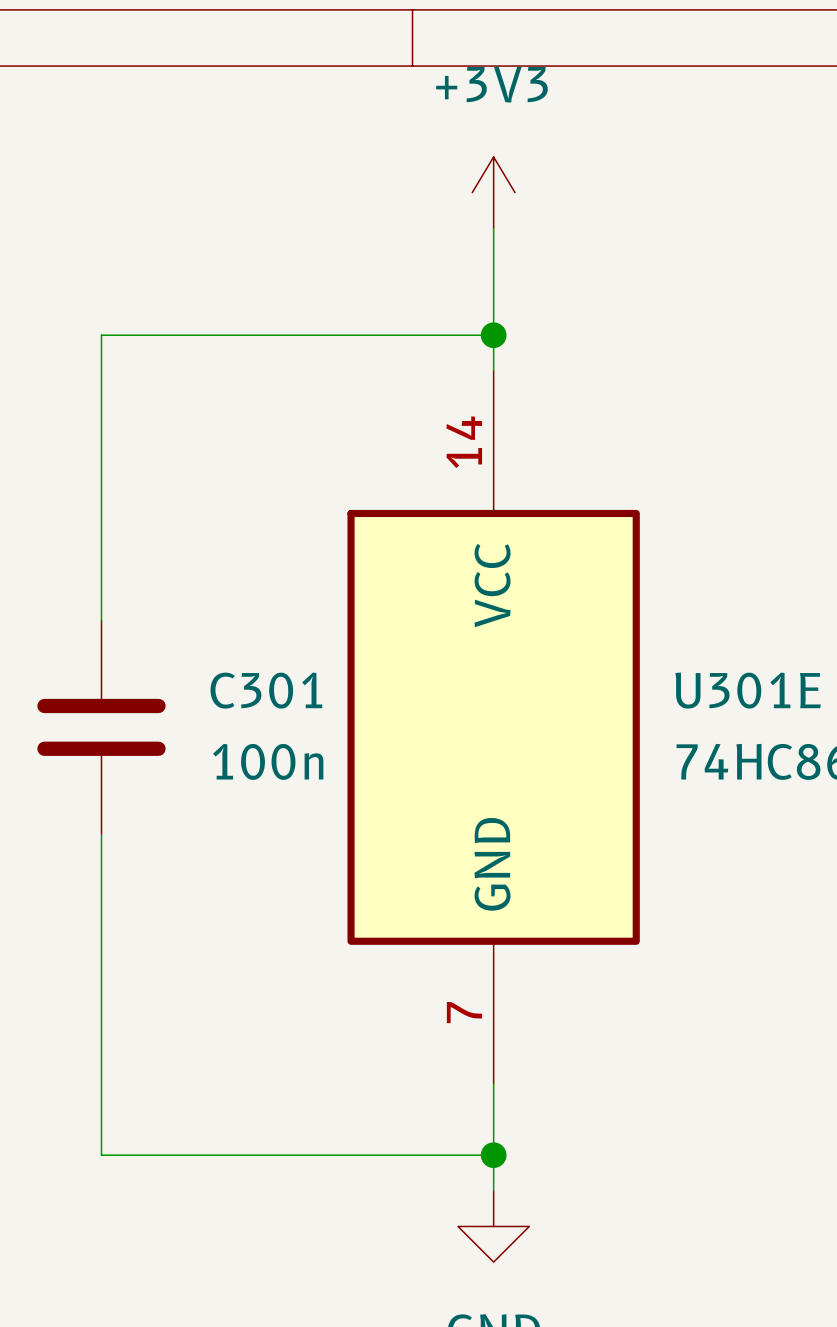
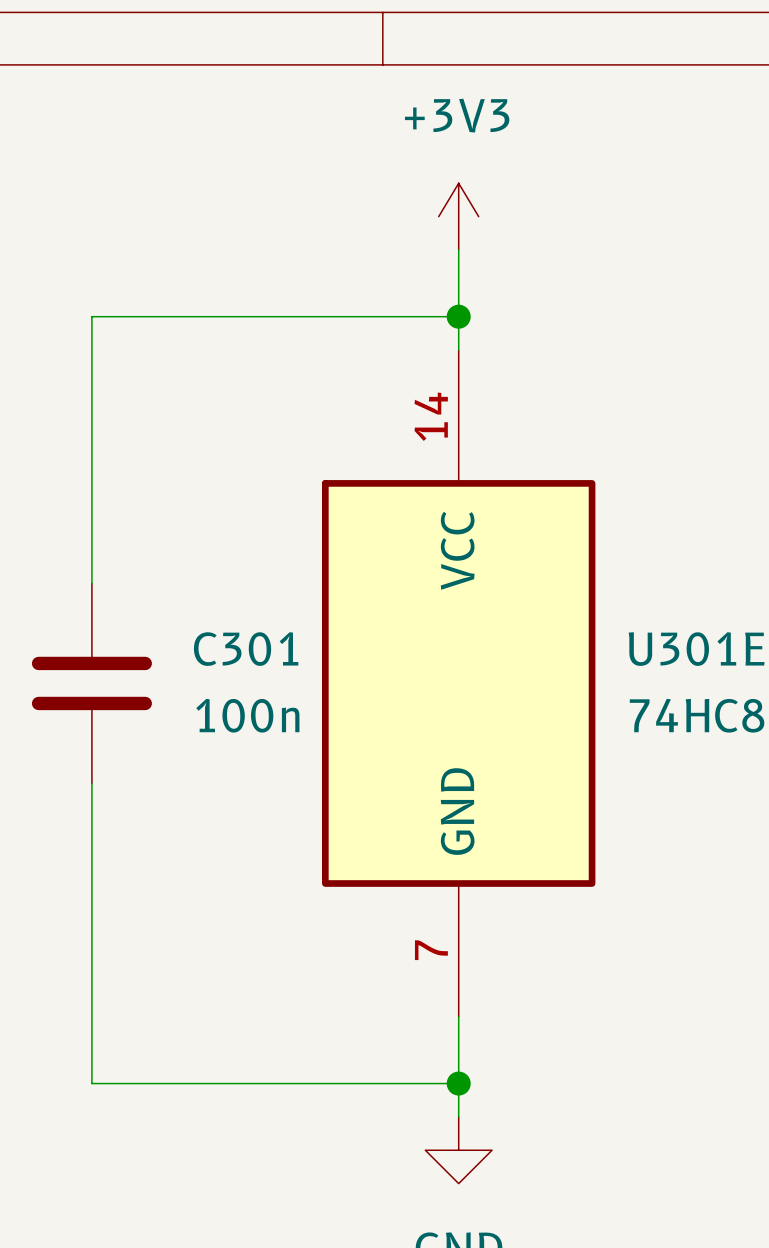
power symbol position: +3V3 (493, 192) -> +3V3 (458, 216)

